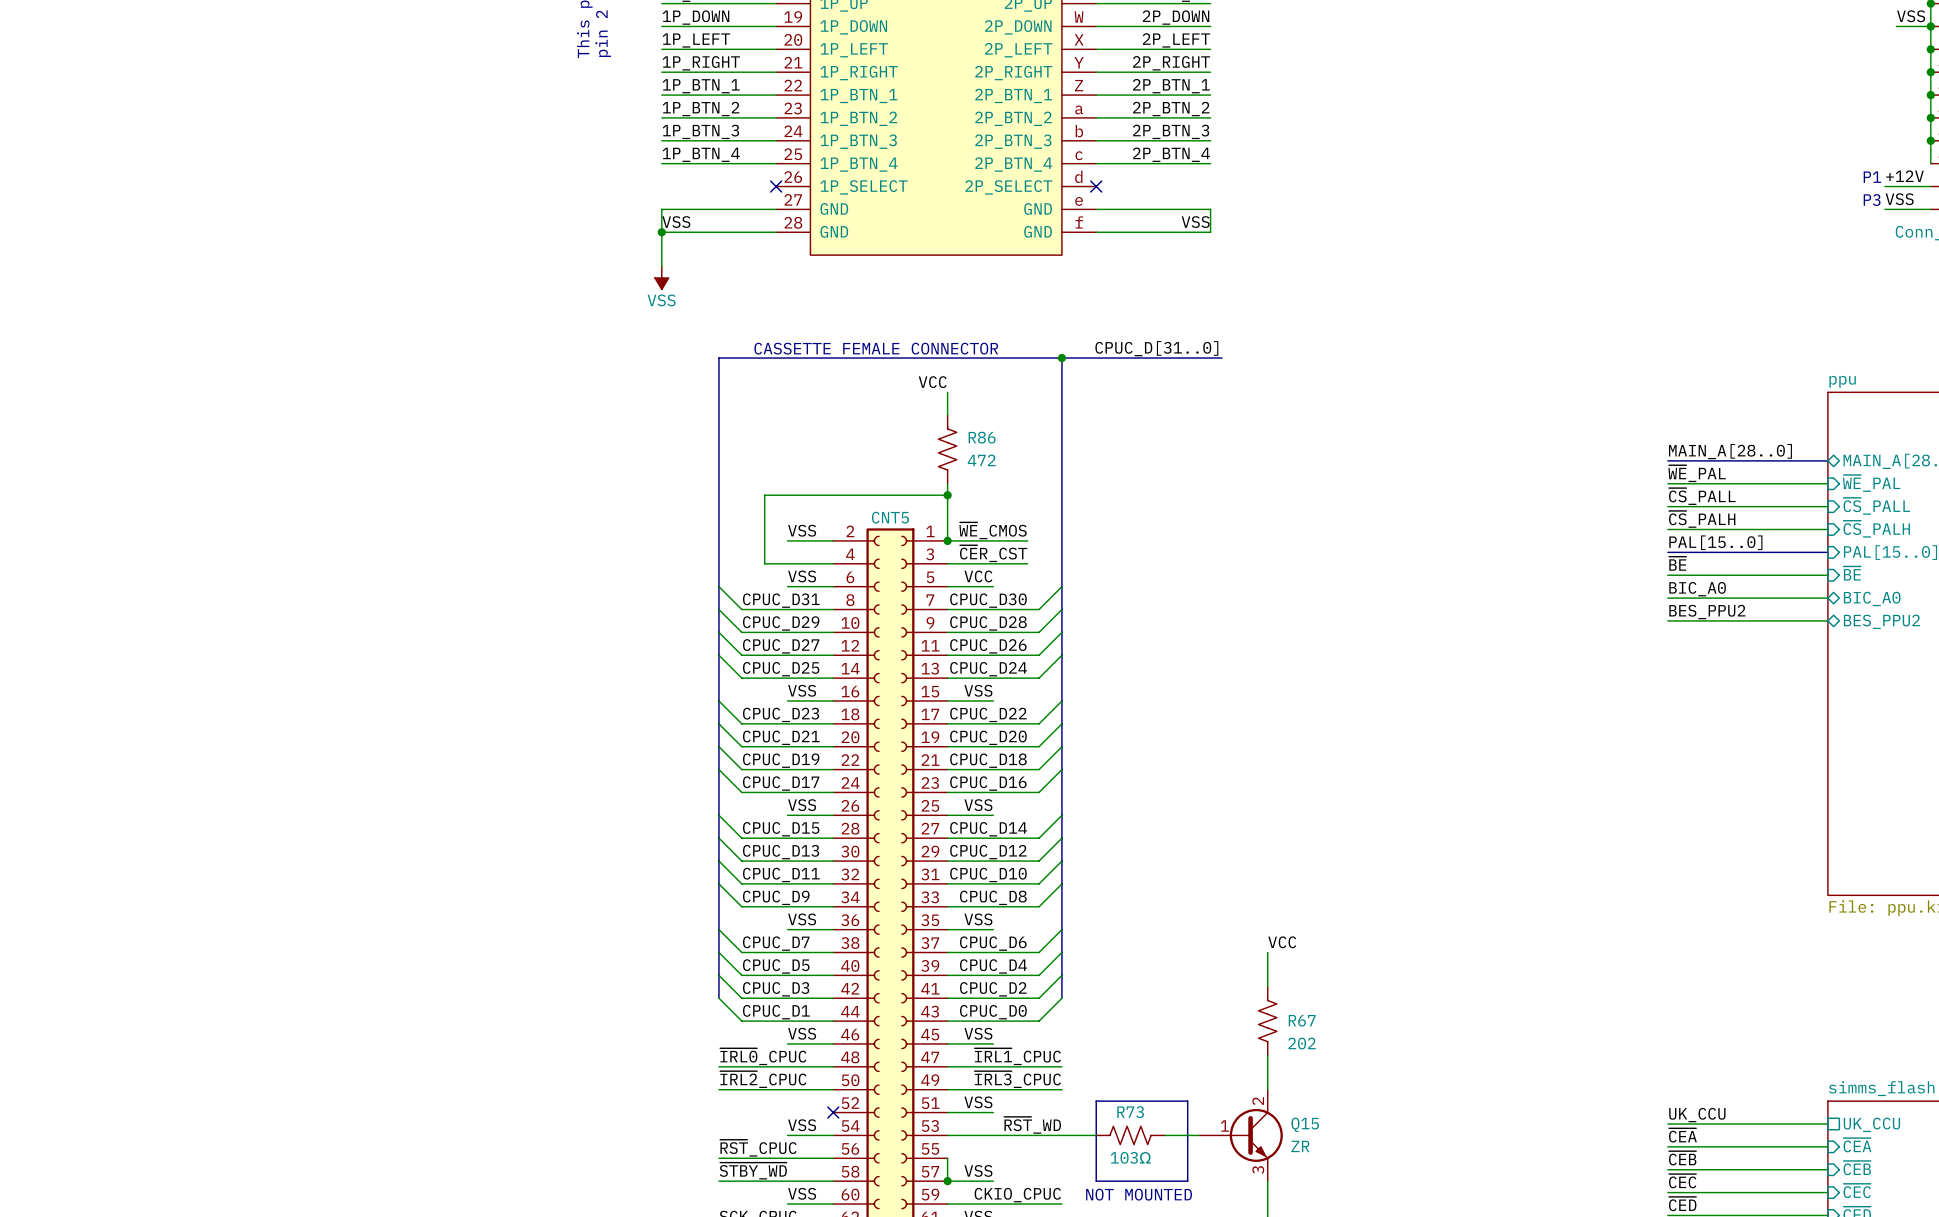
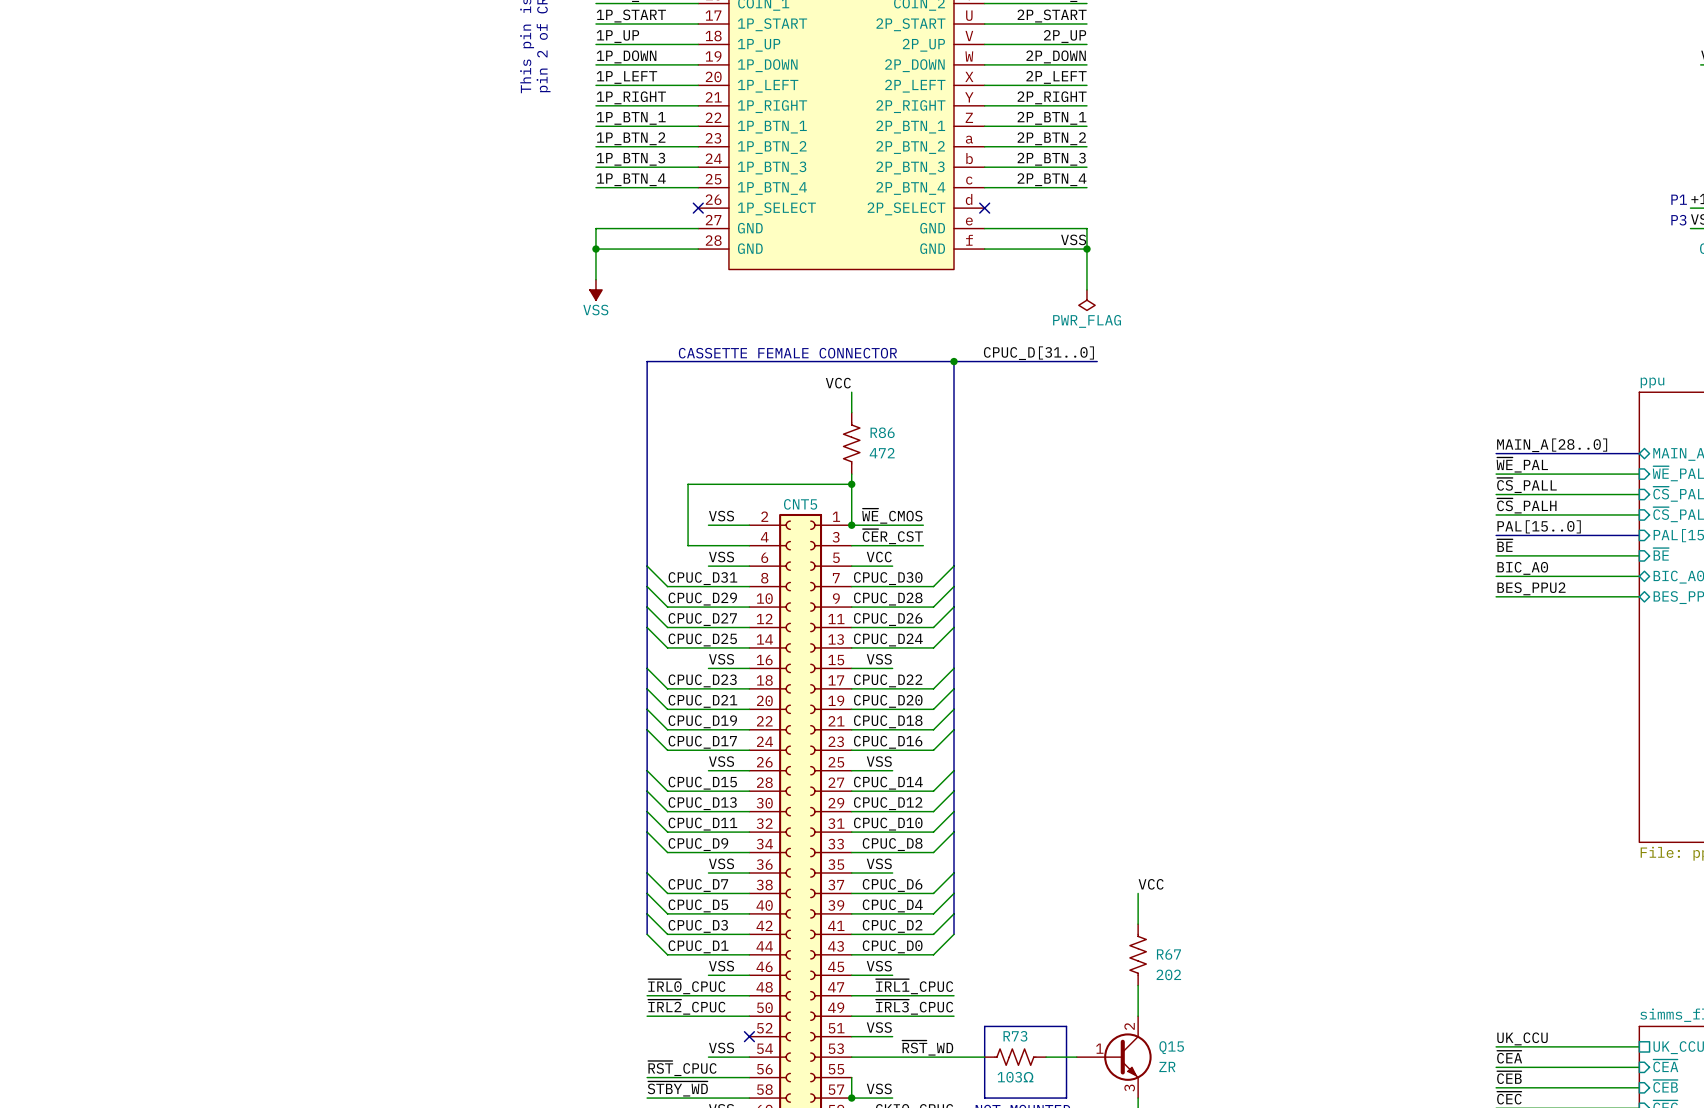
label: VSS (676, 222) -> none
wire: none -> (1086, 249) (1086, 289)
junction: none -> (1086, 249)
power symbol: none -> PWR_FLAG (1086, 300)

